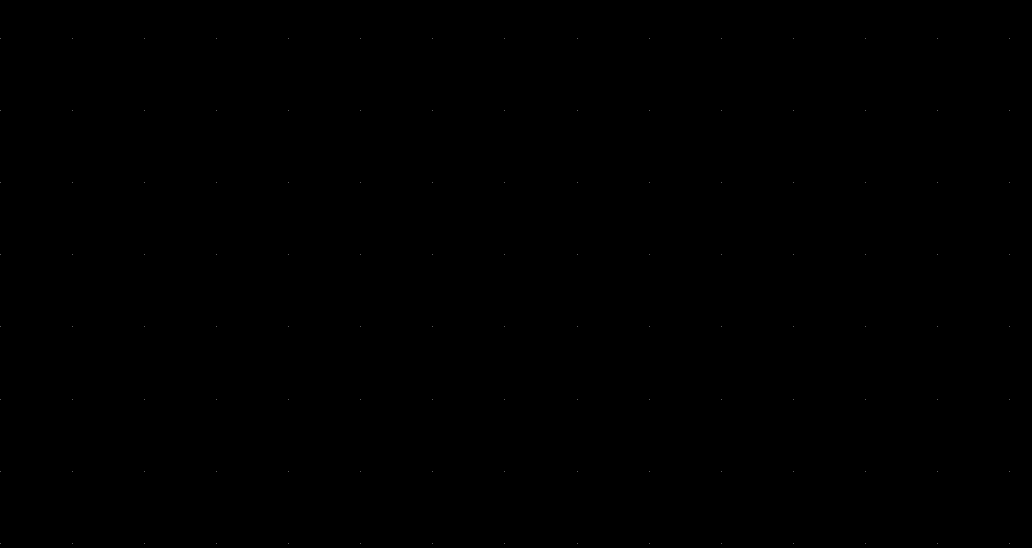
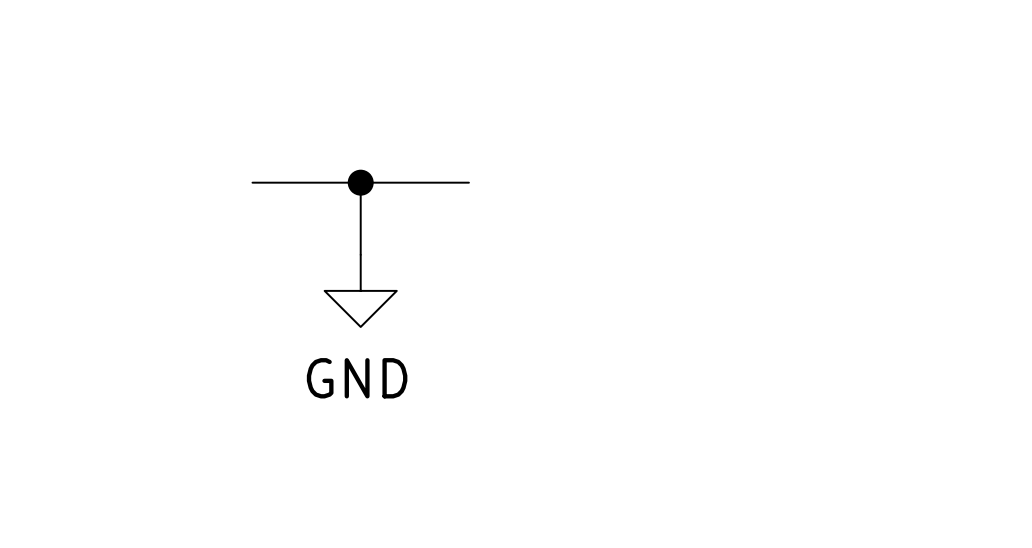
wire: none -> (252, 182) (468, 182)
wire: none -> (360, 182) (360, 254)
junction: none -> (360, 182)
power symbol: none -> GND (360, 290)

